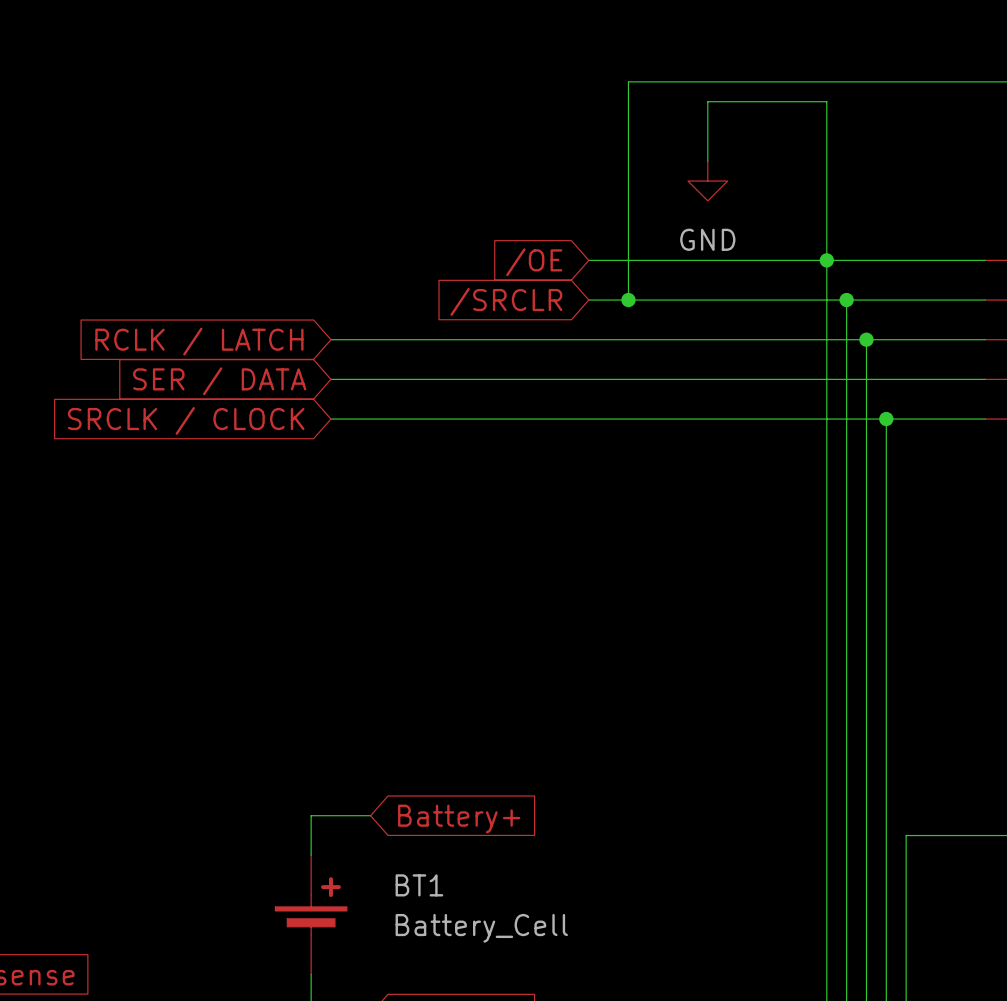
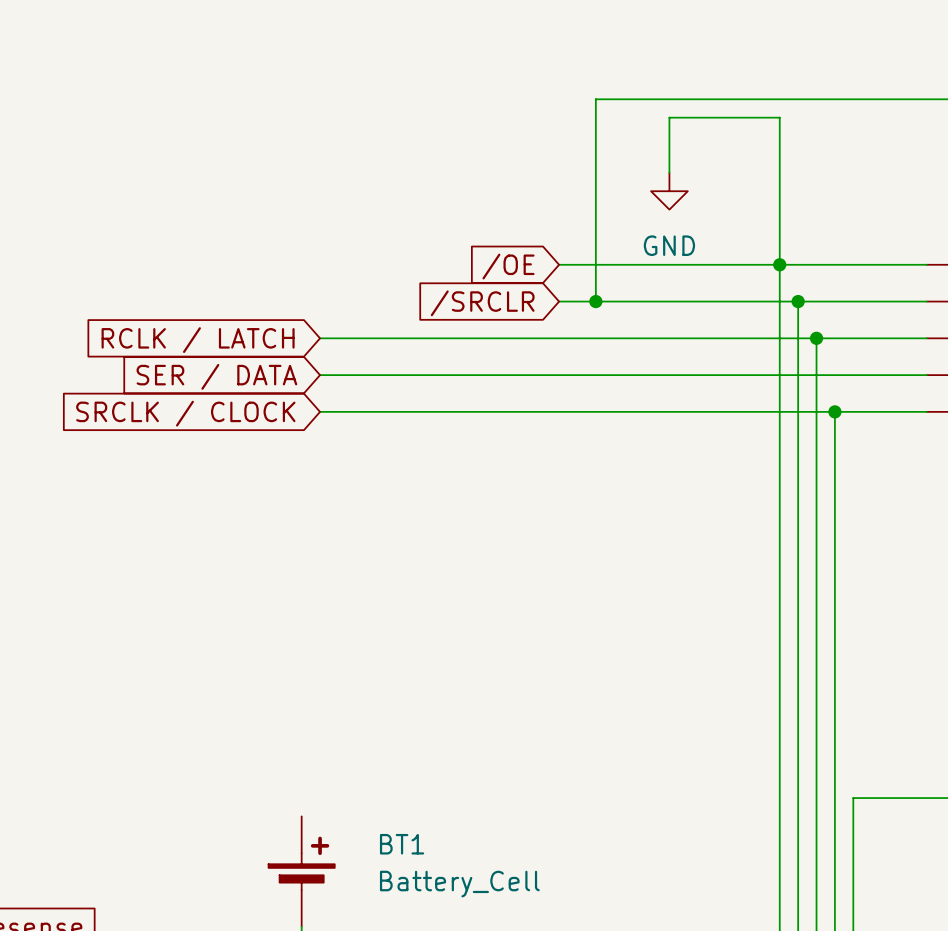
wire: (370, 815) (311, 815) (311, 855) -> none
global label: Battery+ (459, 819) -> none

